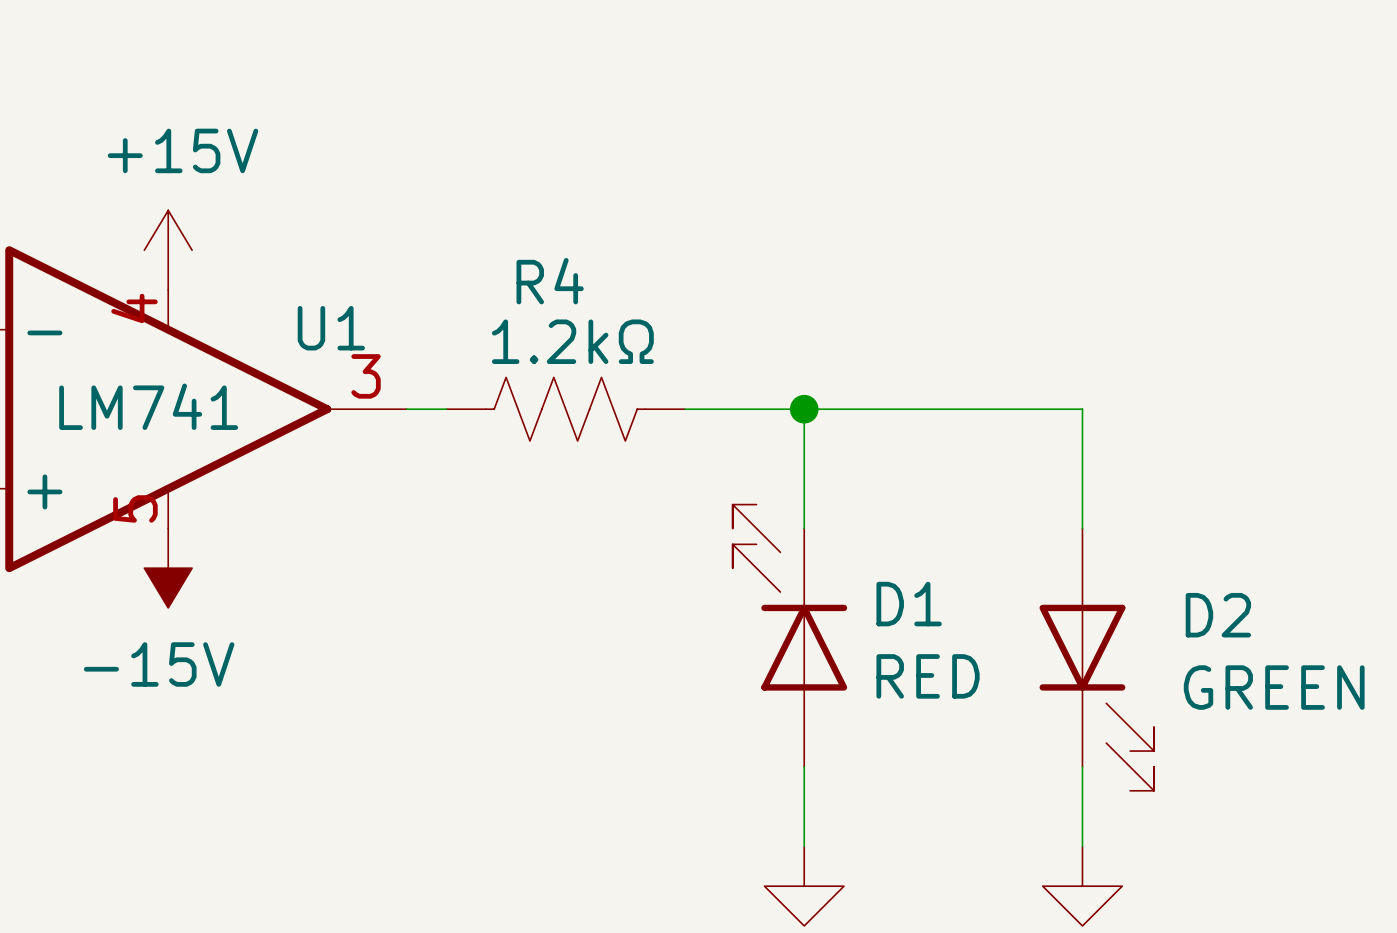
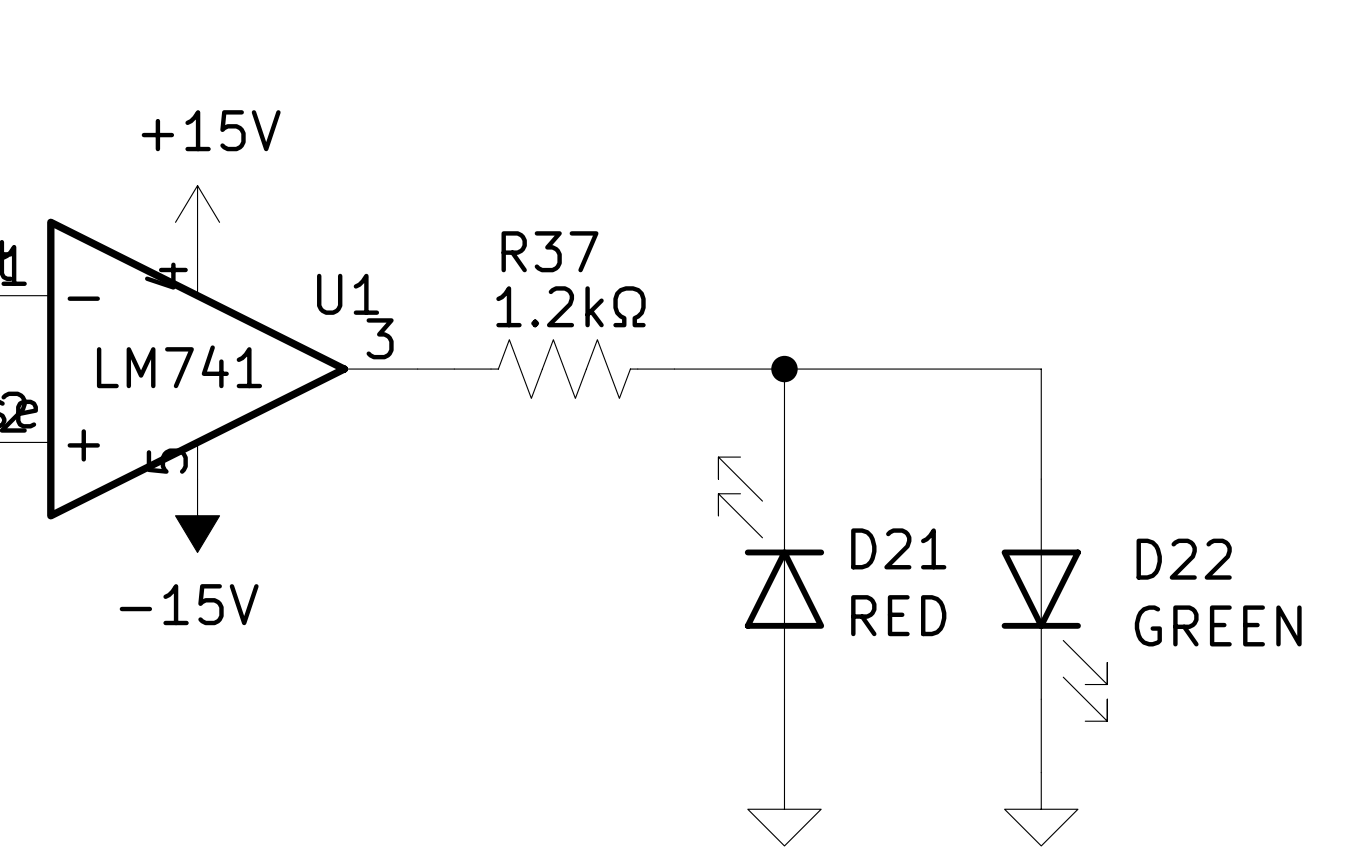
R4 name: R4 (550, 281) -> R37 (549, 251)
D1 name: D1 (909, 604) -> D21 (898, 548)
D2 name: D2 (1218, 615) -> D22 (1184, 559)

